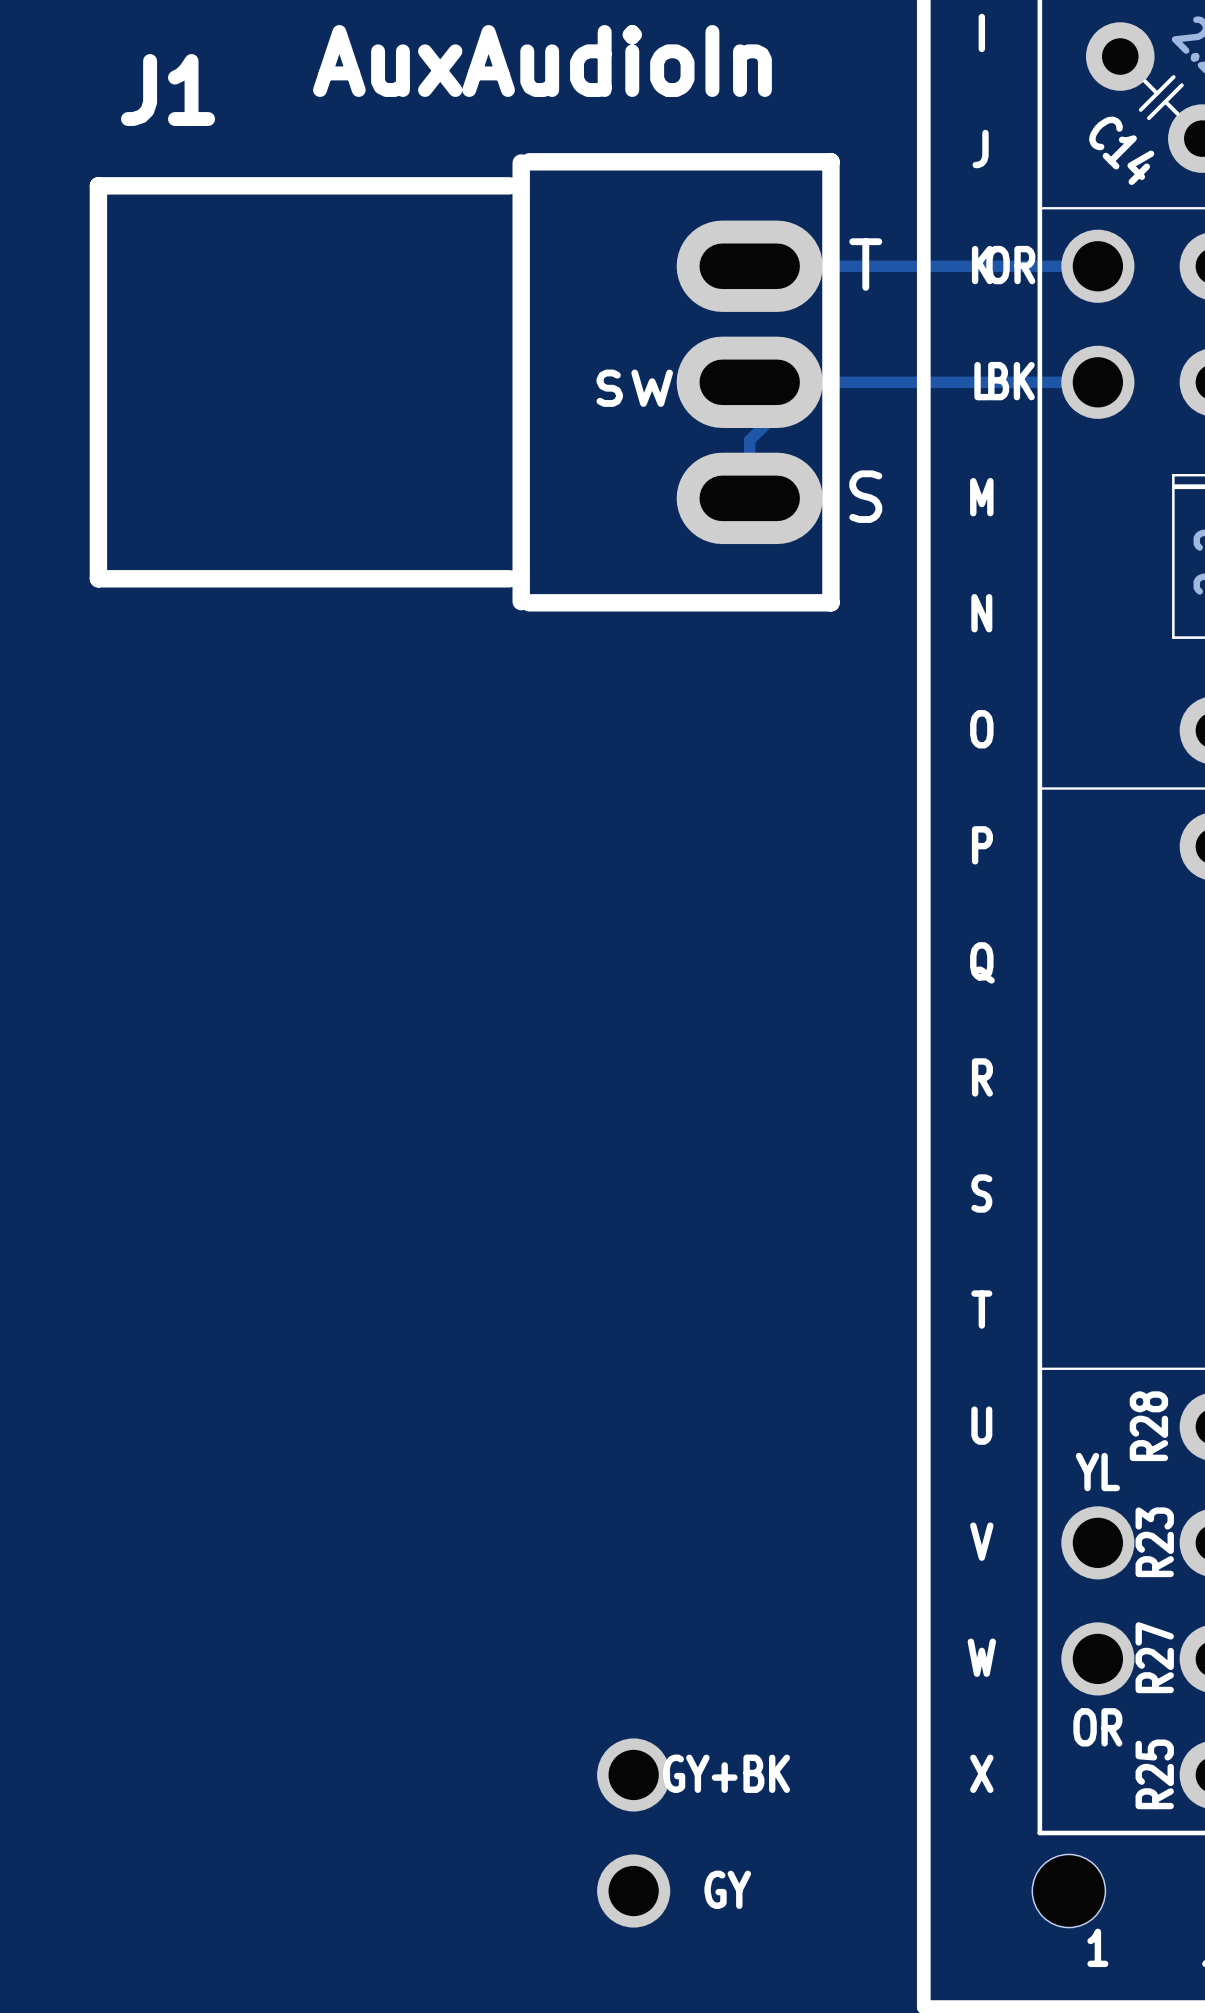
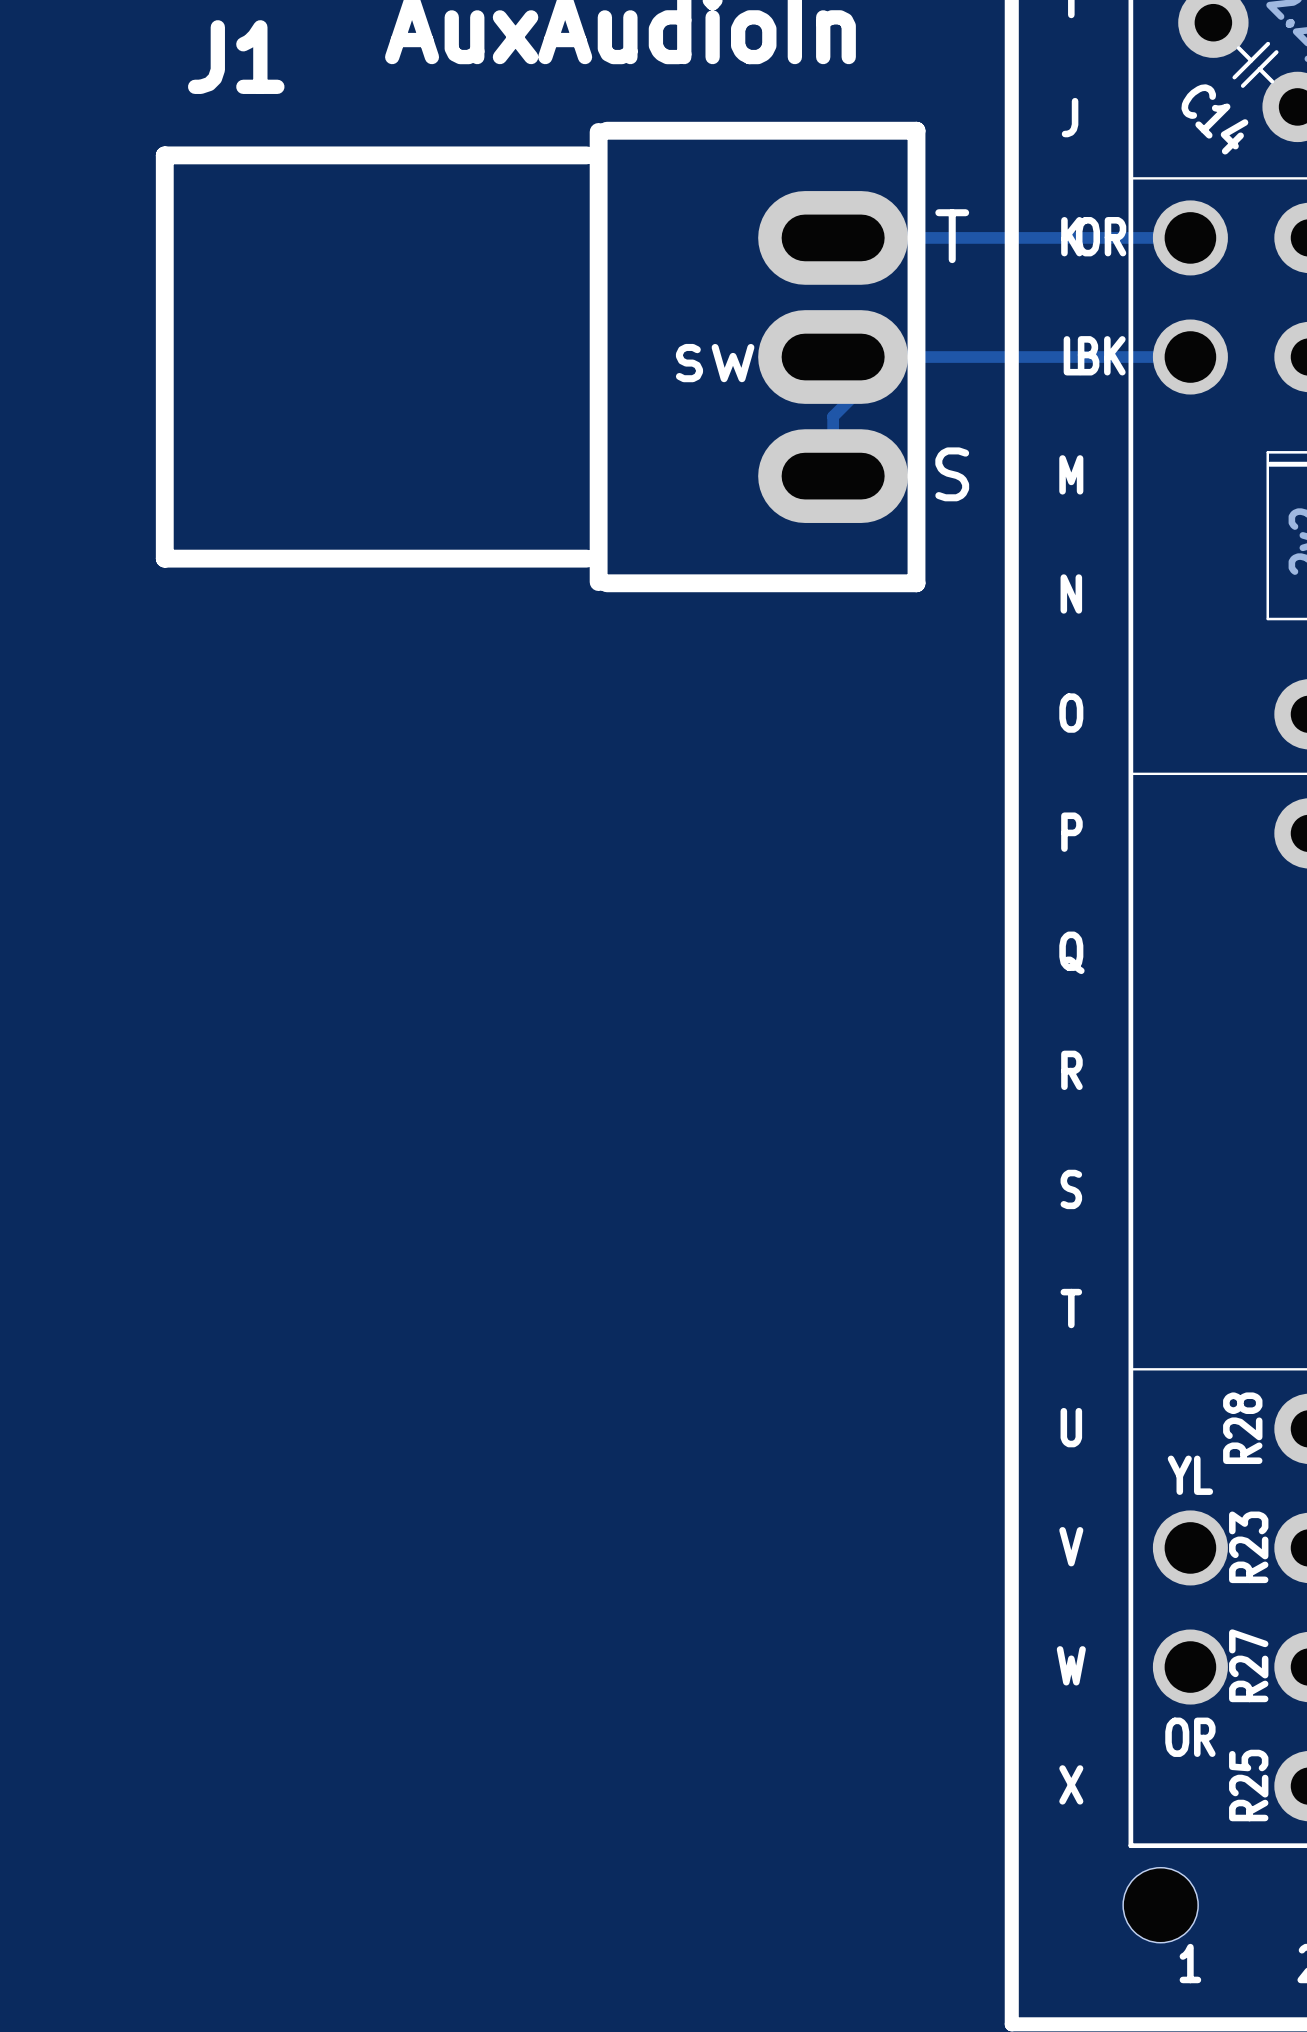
part: GY+BK (633, 1774) -> none
part: GY (633, 1891) -> none

